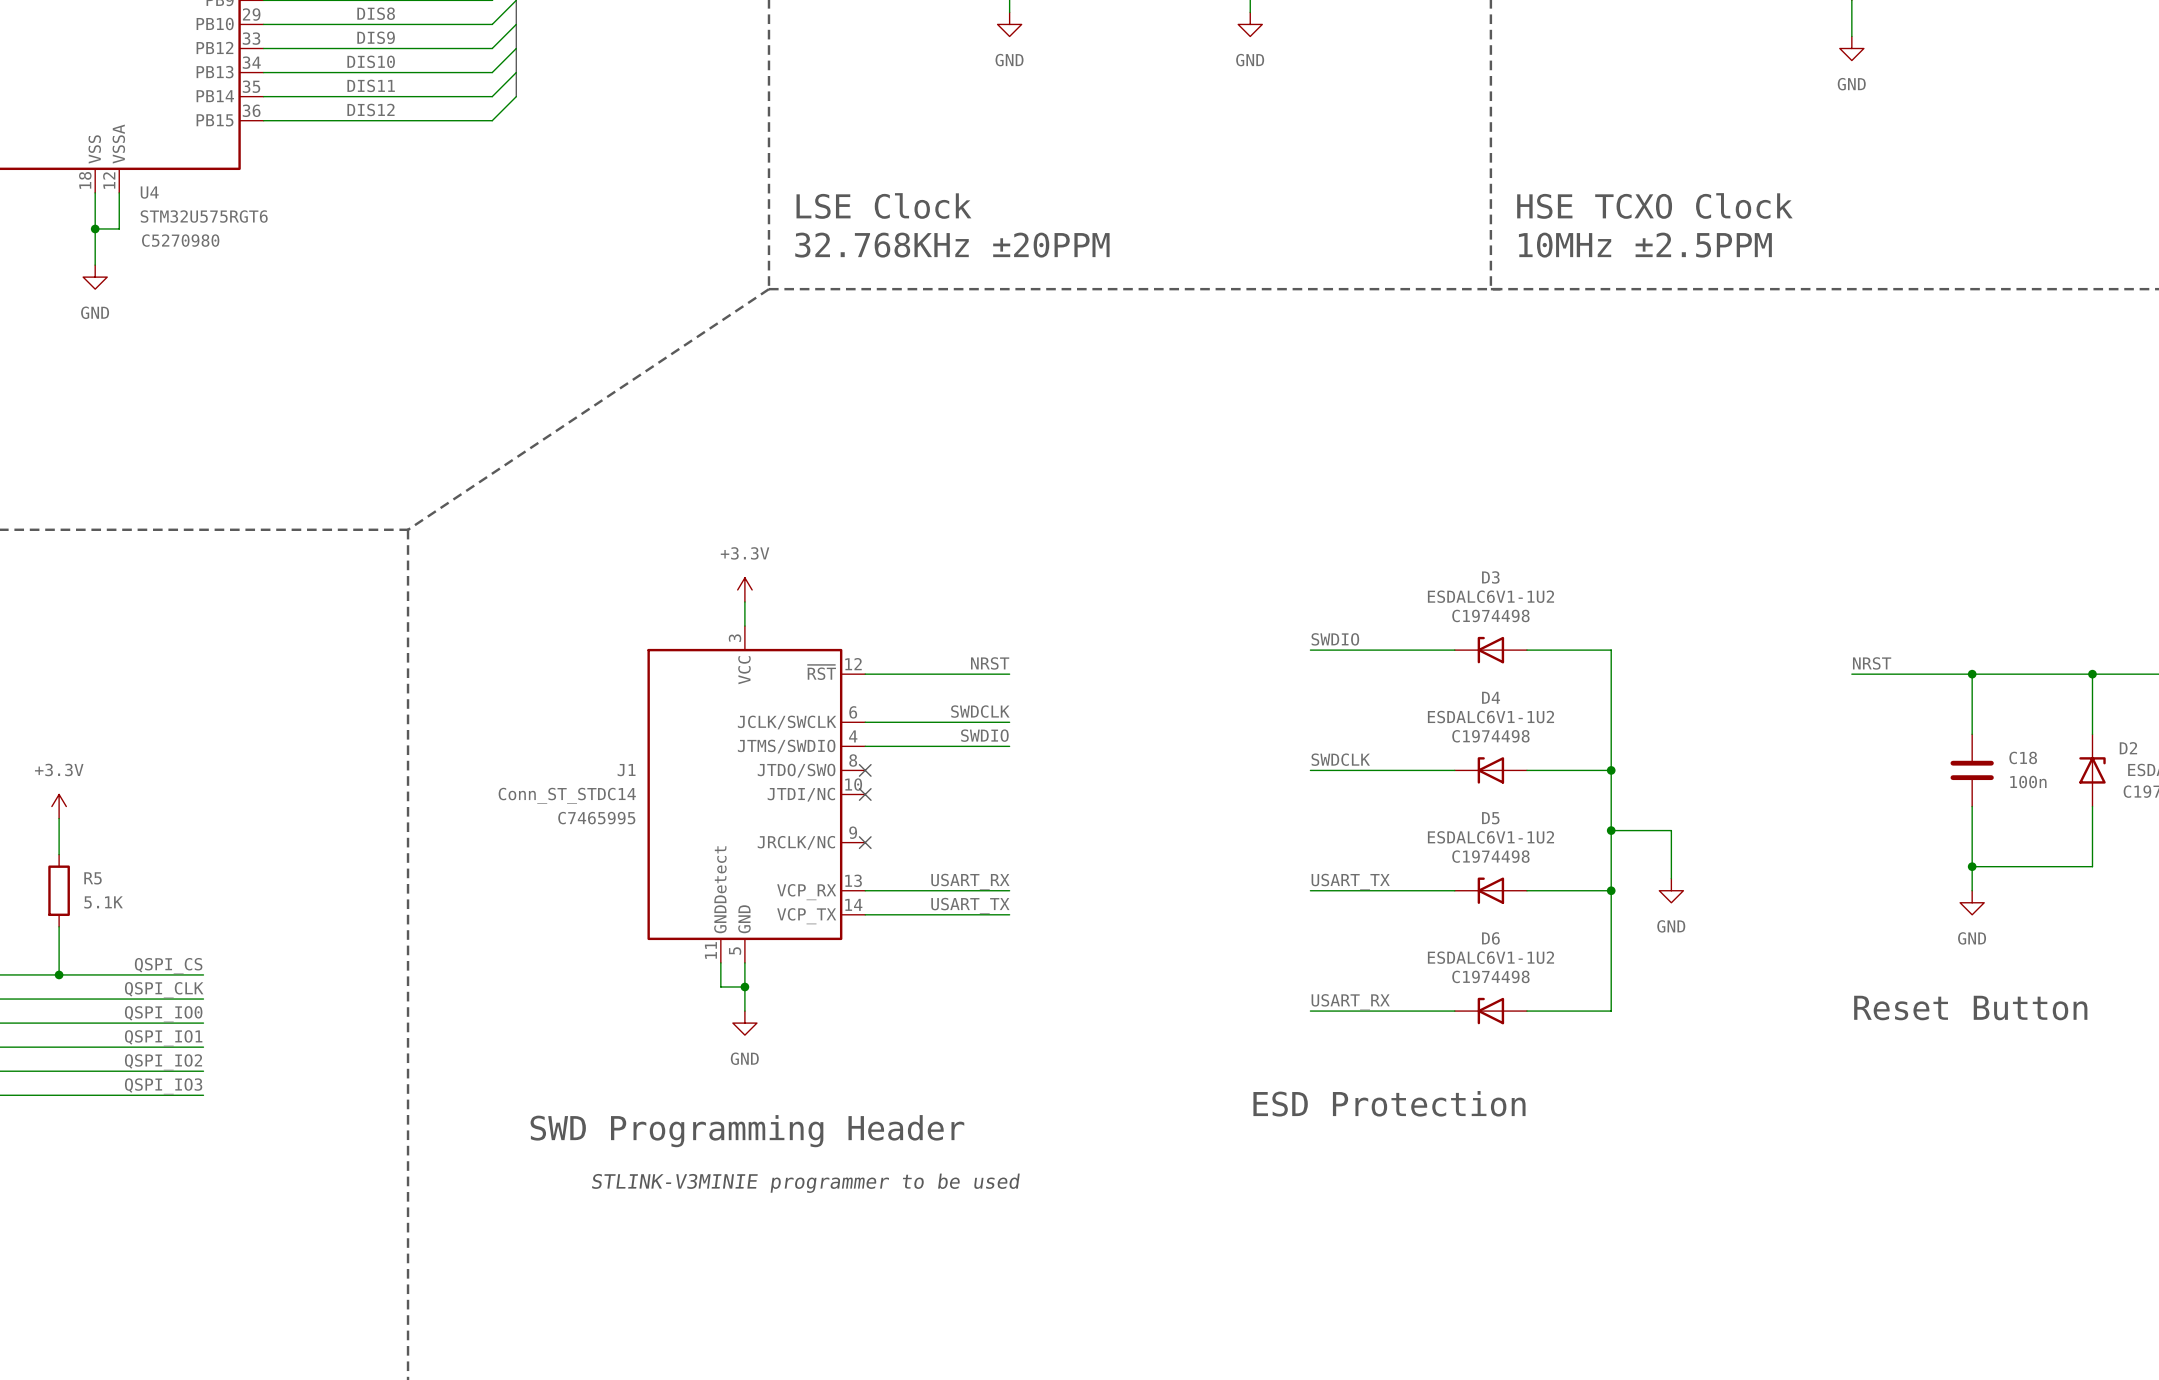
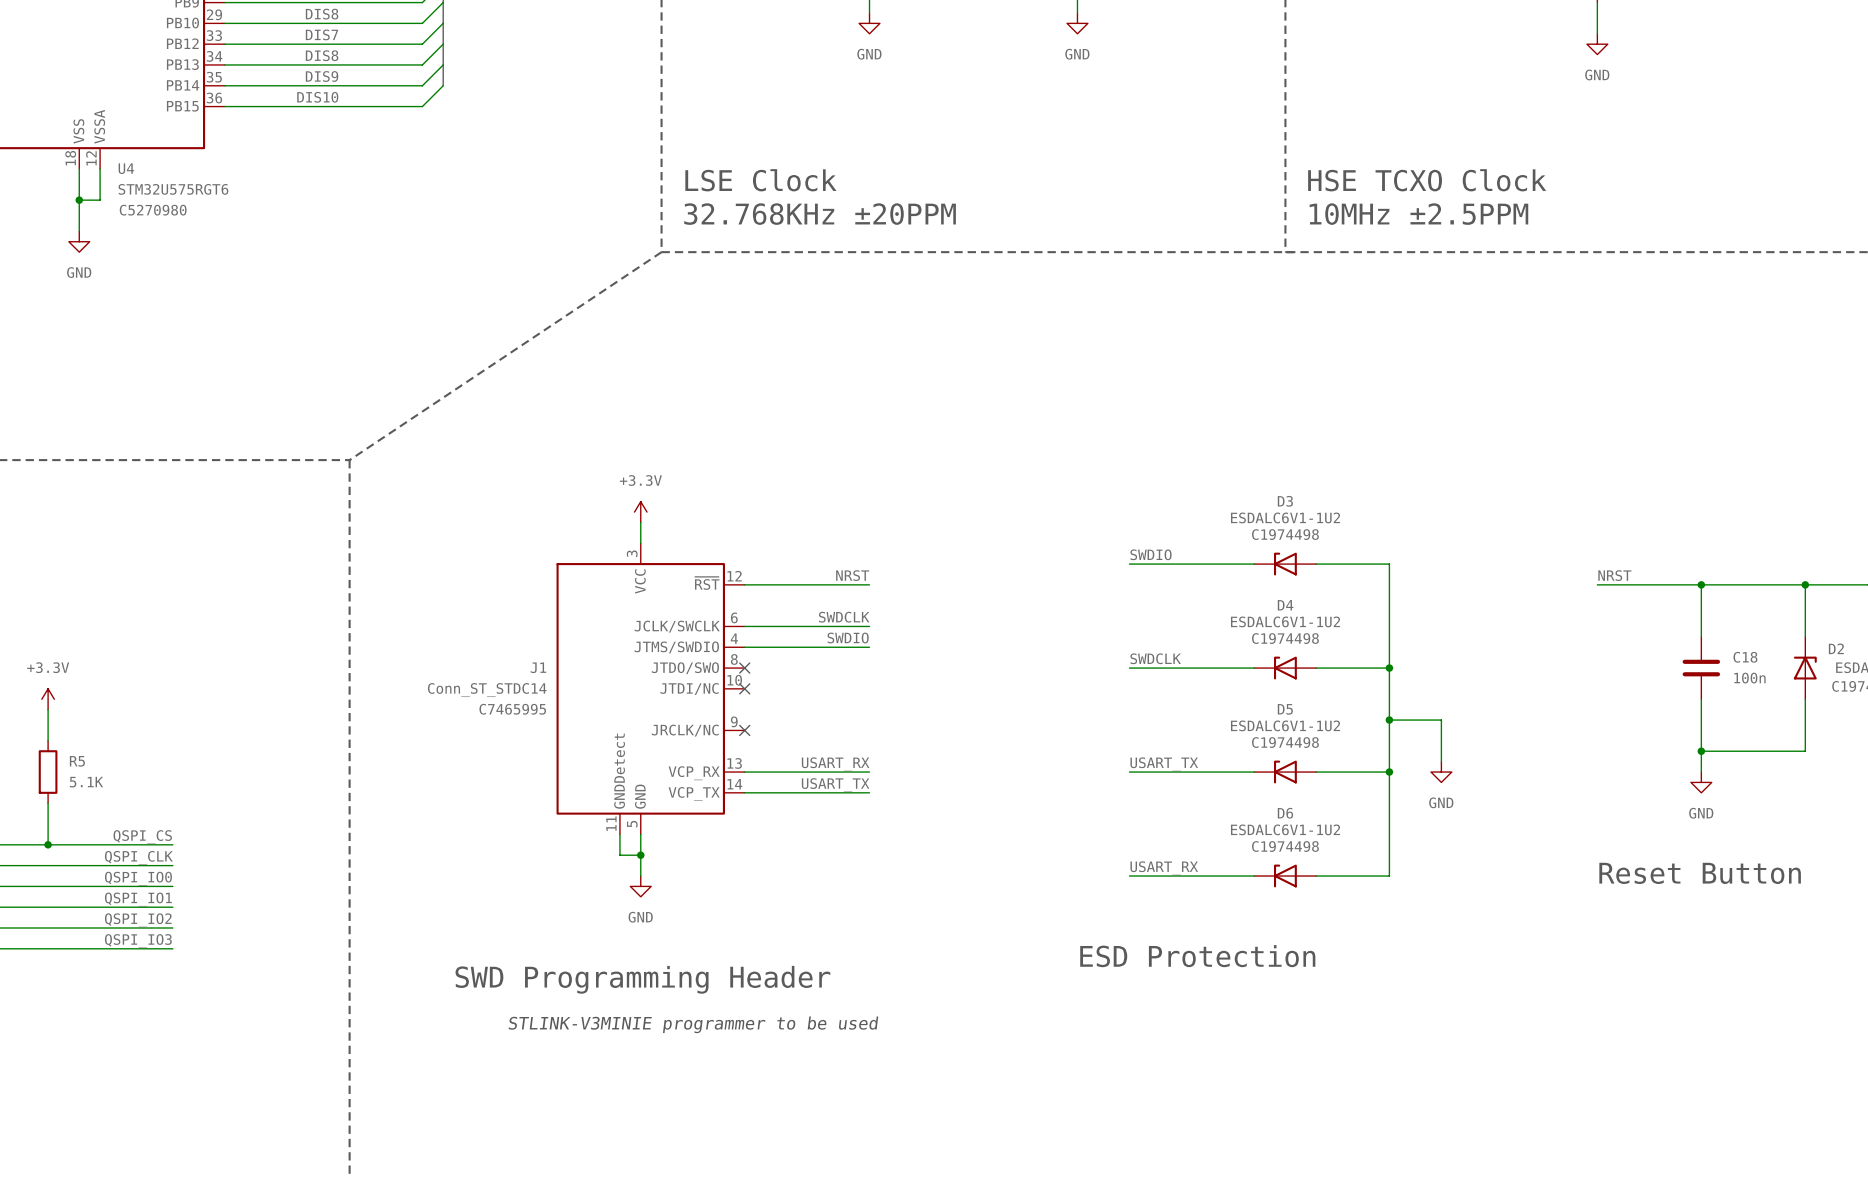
label: DIS9 (376, 37) -> DIS7 (321, 34)
label: DIS10 (371, 61) -> DIS8 (322, 55)
label: DIS11 (371, 85) -> DIS9 (322, 76)
label: DIS12 (371, 109) -> DIS10 (317, 97)

